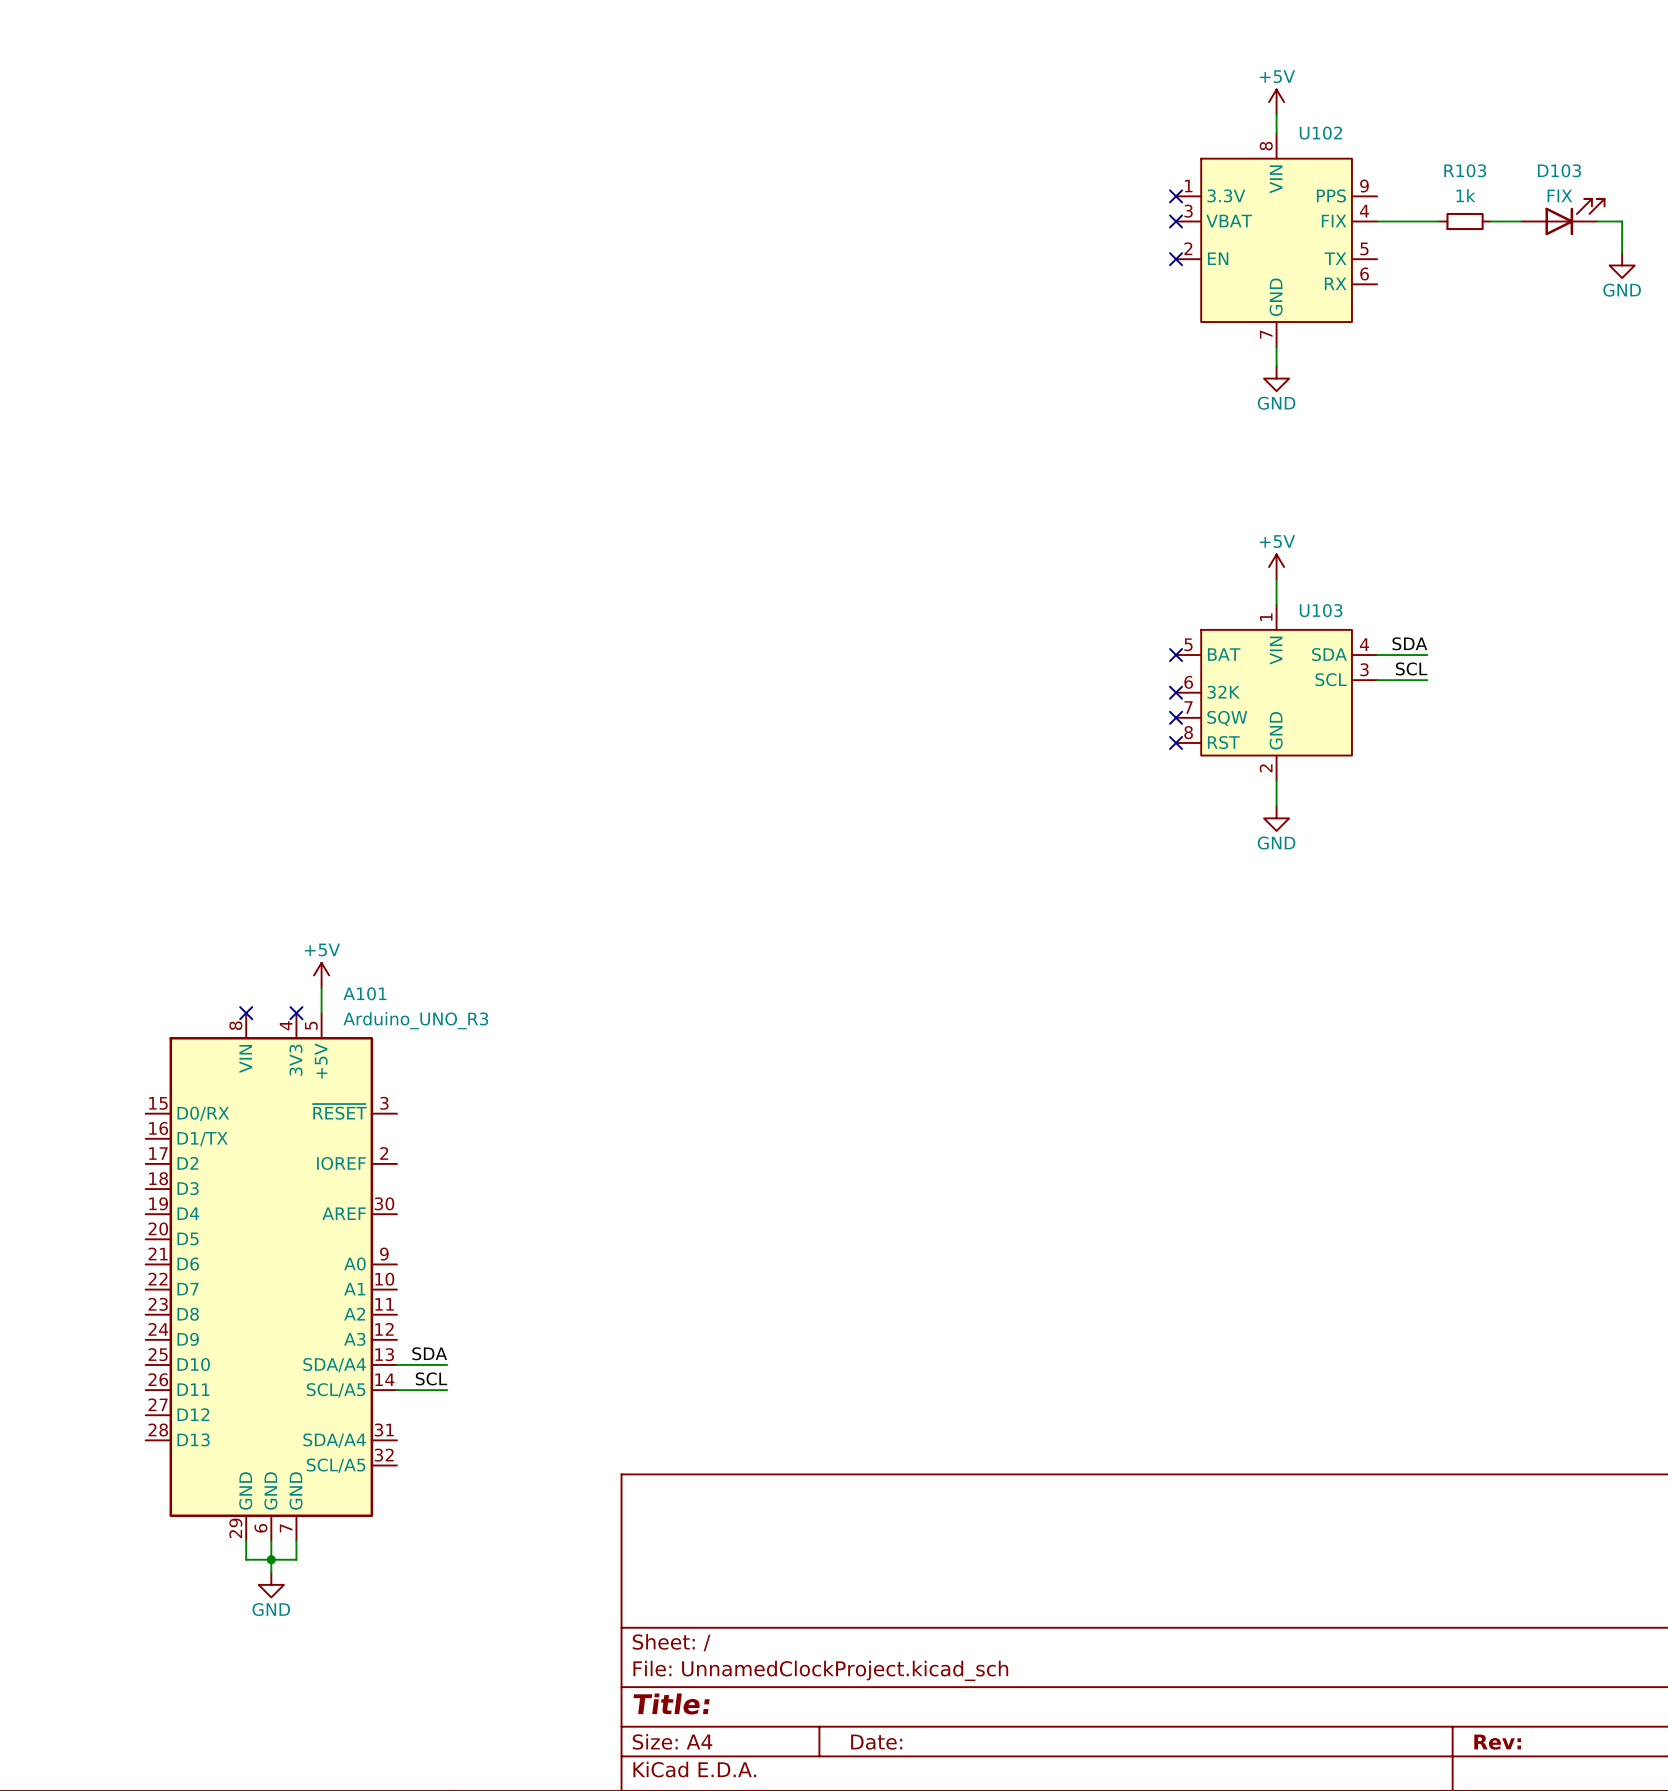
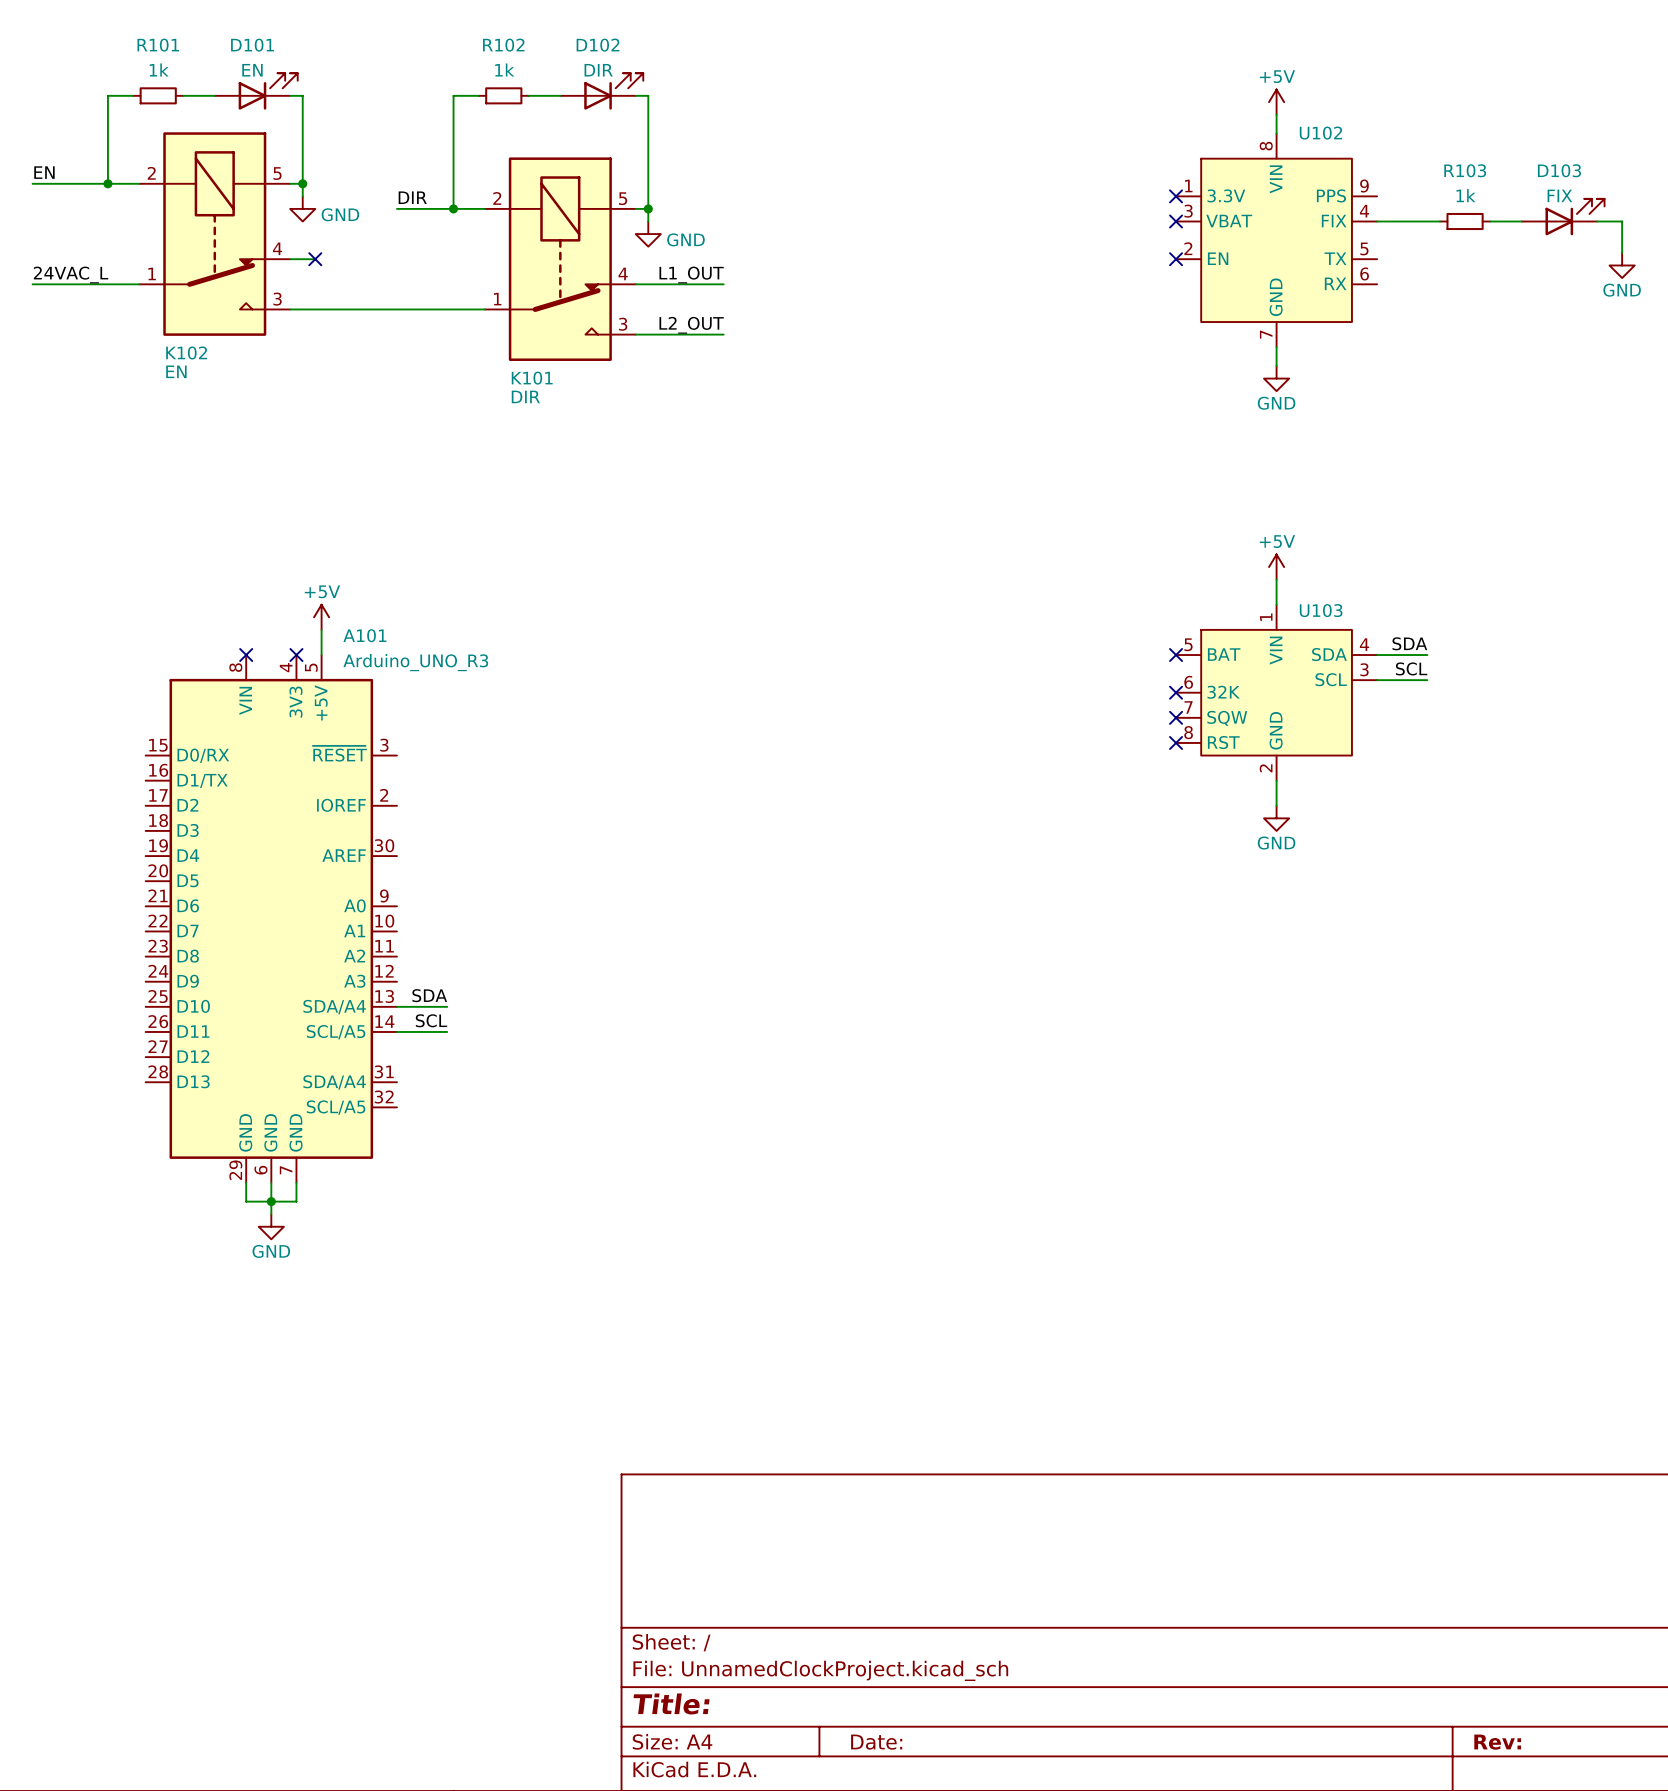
D101: none -> EN (256, 91)
D102: none -> DIR (601, 91)
wire: none -> (133, 95) (107, 95) (107, 183)
R101: none -> 1k (158, 95)
wire: none -> (183, 95) (214, 95)
wire: none -> (290, 95) (302, 95) (302, 196)
wire: none -> (478, 95) (453, 95) (453, 208)
R102: none -> 1k (503, 95)
wire: none -> (528, 95) (560, 95)
wire: none -> (635, 95) (648, 95) (648, 221)
label: none -> EN (44, 172)
wire: none -> (32, 183) (139, 183)
junction: none -> (107, 183)
wire: none -> (290, 183) (302, 183)
junction: none -> (302, 183)
label: none -> DIR (412, 197)
power symbol: none -> GND (302, 208)
wire: none -> (396, 208) (484, 208)
junction: none -> (453, 208)
wire: none -> (635, 208) (648, 208)
junction: none -> (648, 208)
K102: none -> EN (214, 234)
power symbol: none -> GND (648, 234)
wire: none -> (290, 259) (315, 259)
no-connect mark: none -> (315, 259)
K101: none -> DIR (560, 259)
label: none -> 24VAC_L (71, 275)
label: none -> L1_OUT (691, 275)
wire: none -> (32, 284) (139, 284)
wire: none -> (635, 284) (723, 284)
wire: none -> (290, 309) (484, 309)
label: none -> L2_OUT (691, 325)
wire: none -> (635, 334) (723, 334)
power symbol: none -> +5V (321, 617)
wire: none -> (321, 629) (321, 655)
no-connect mark: none -> (246, 655)
no-connect mark: none -> (296, 655)
power symbol: +5V (321, 975) -> none
label: none -> SDA (429, 995)
wire: none -> (396, 1006) (447, 1006)
no-connect mark: (246, 1013) -> none
no-connect mark: (296, 1013) -> none
label: none -> SCL (431, 1020)
wire: none -> (396, 1031) (447, 1031)
junction: none -> (271, 1201)
power symbol: none -> GND (271, 1226)
A101 position: (271, 1277) -> (271, 918)
label: SDA (429, 1353) -> none
wire: (396, 1364) (447, 1364) -> none
label: SCL (431, 1378) -> none
wire: (396, 1390) (447, 1390) -> none
wire: (246, 1540) (246, 1559) (296, 1559) (296, 1540) -> none
wire: (271, 1540) (271, 1572) -> none
junction: (271, 1559) -> none
power symbol: GND (271, 1584) -> none

